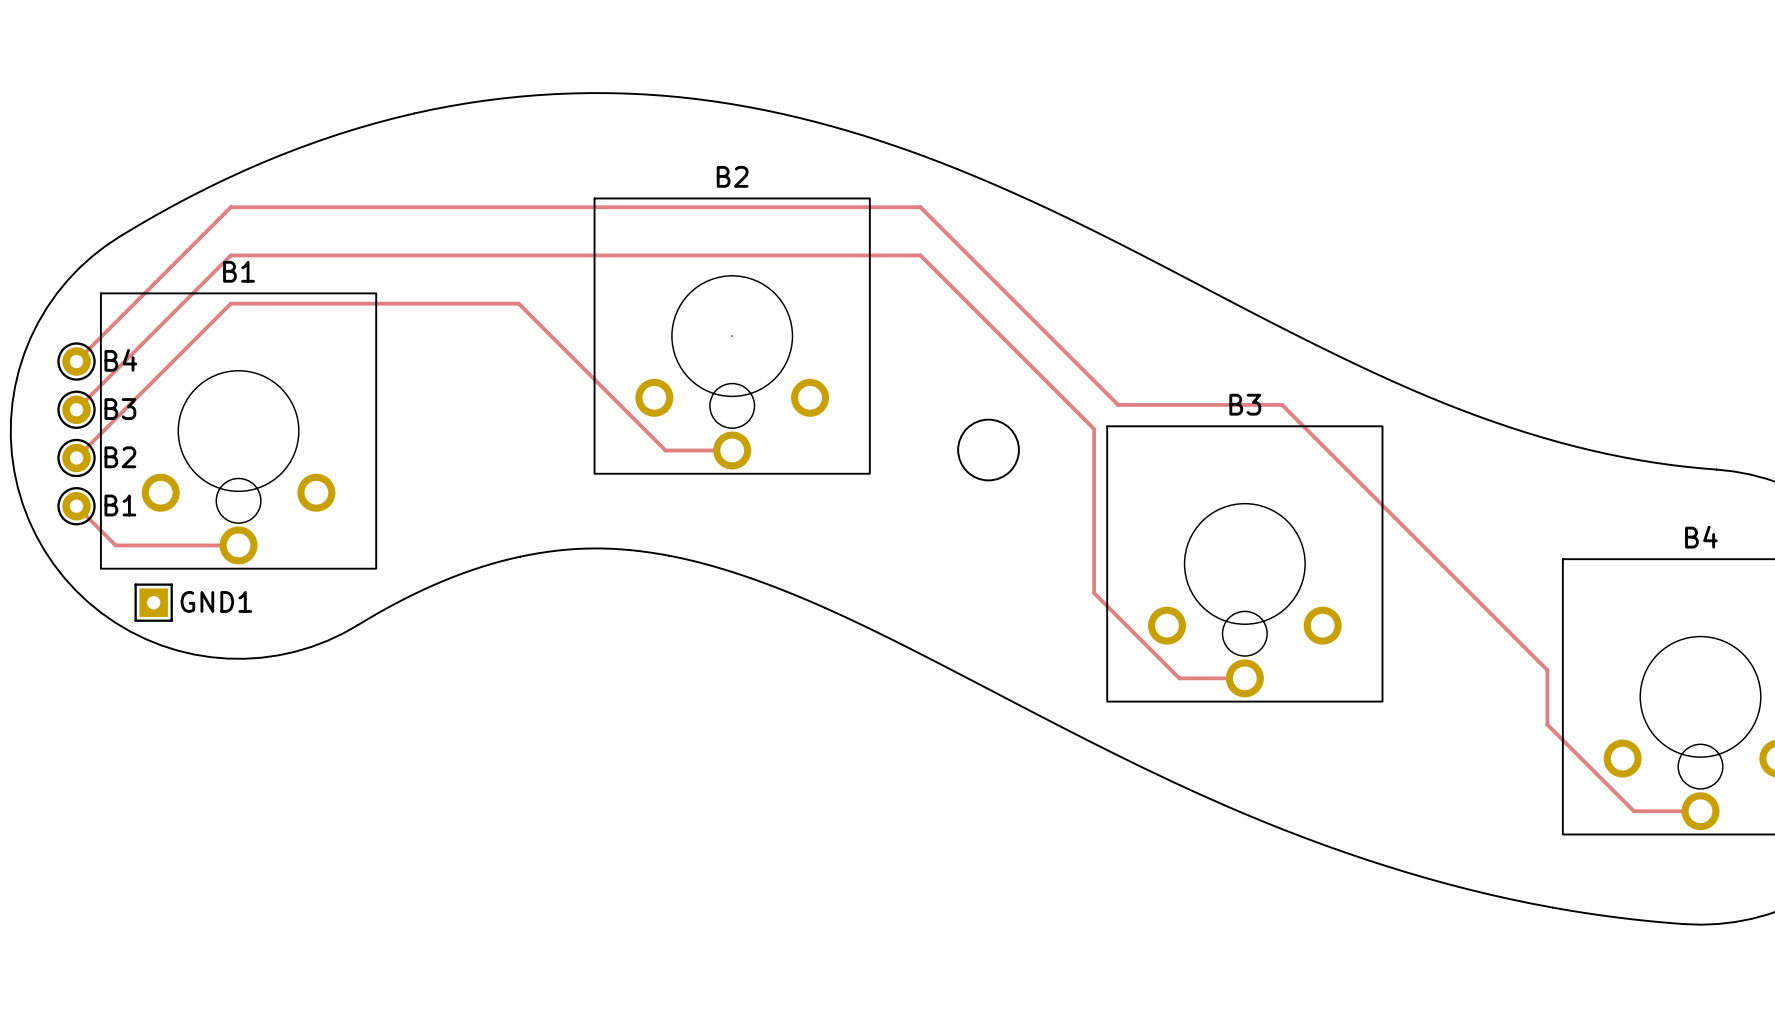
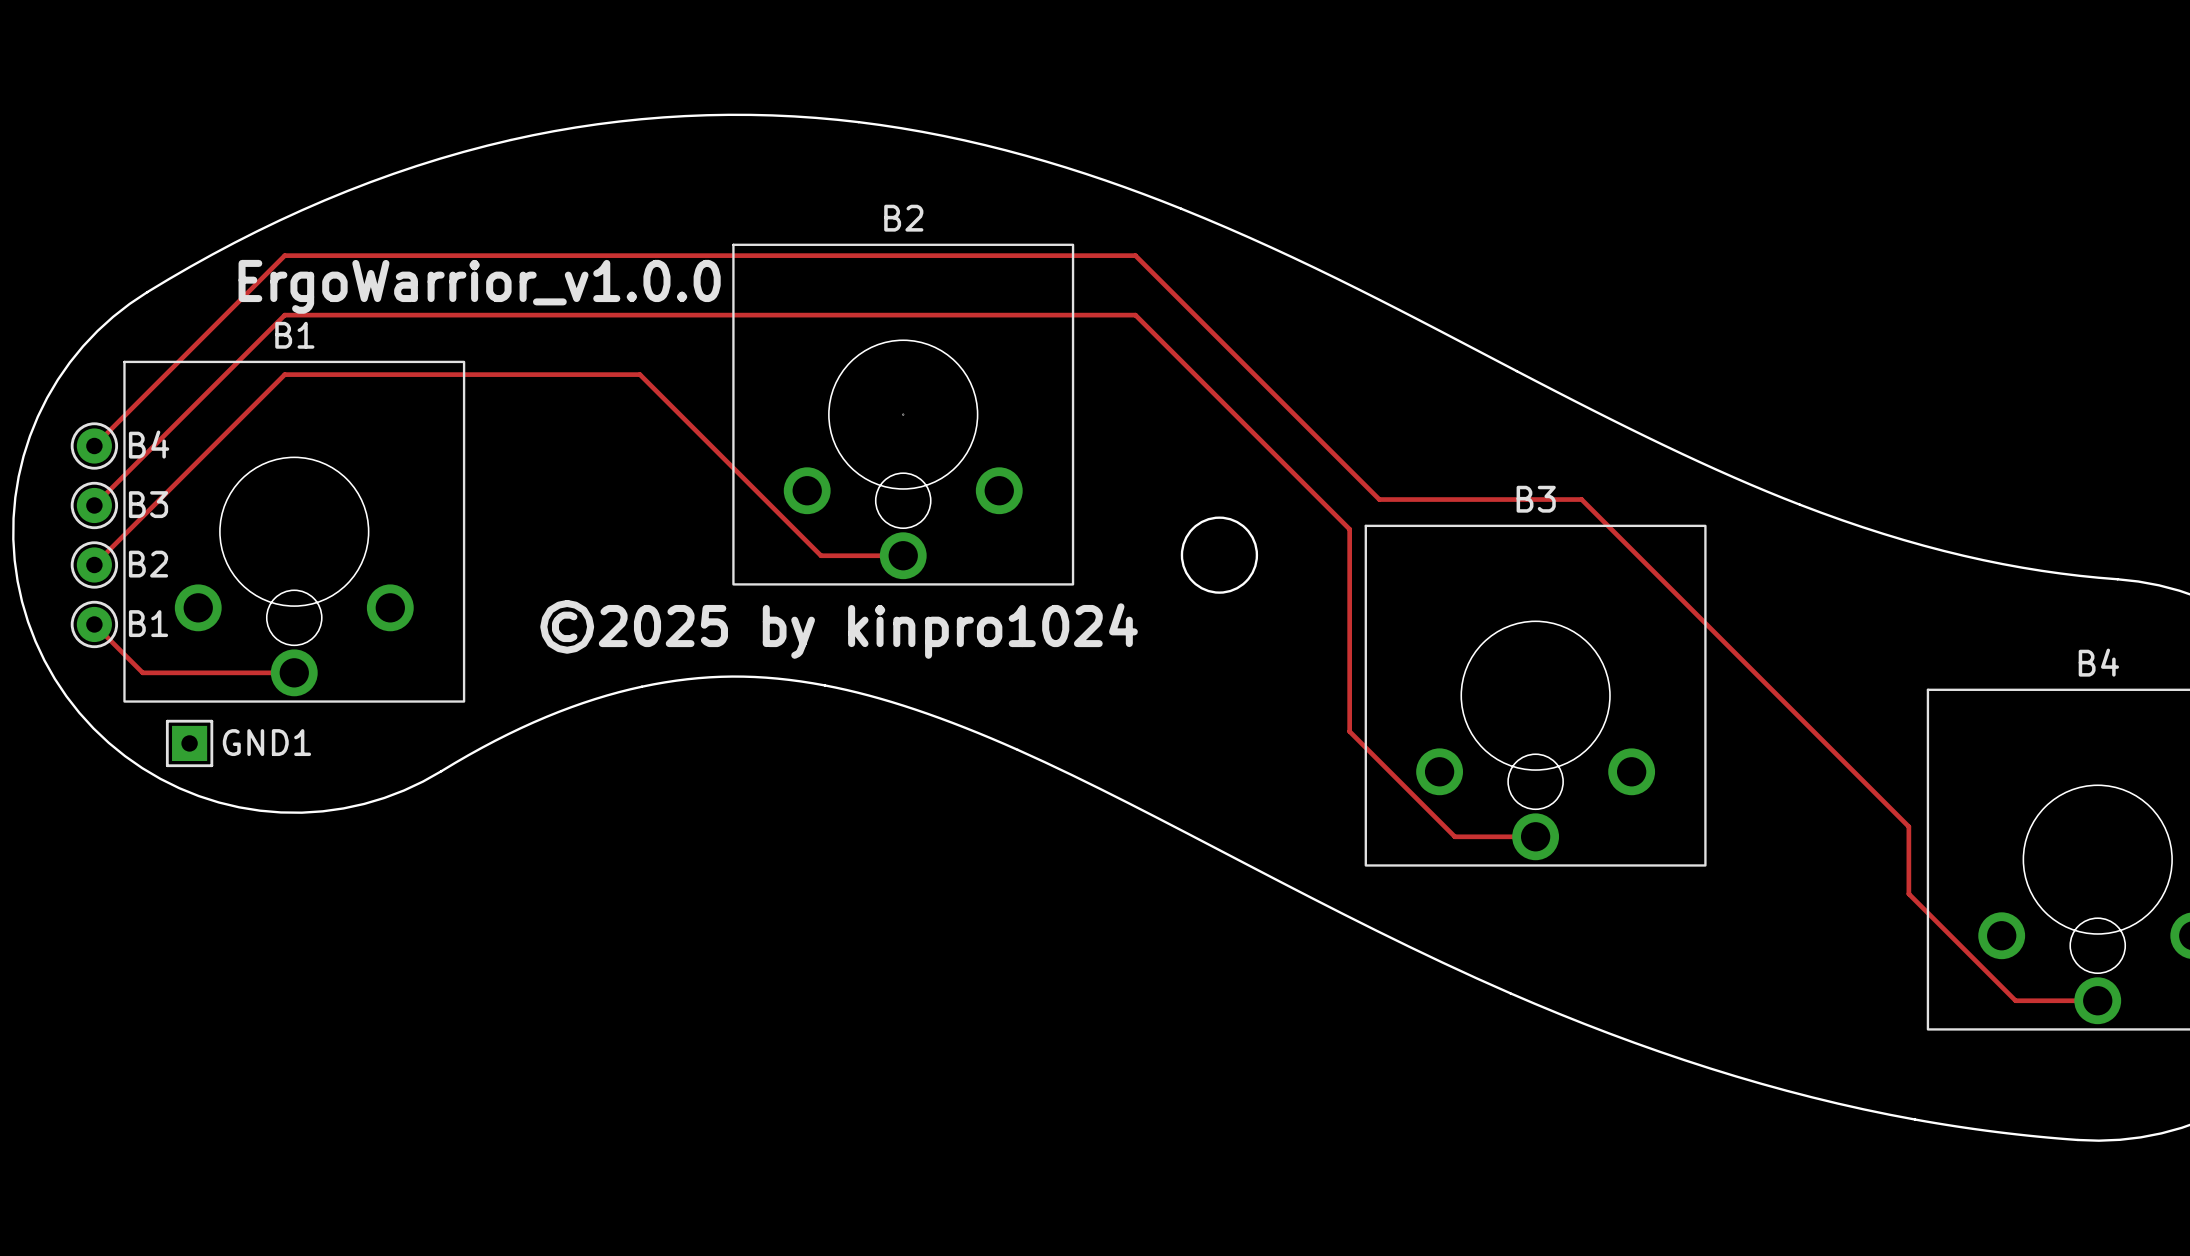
text: none -> ErgoWarrior_v1.0.0 (479, 286)
text: none -> ©2025 by kinpro1024 (839, 629)

